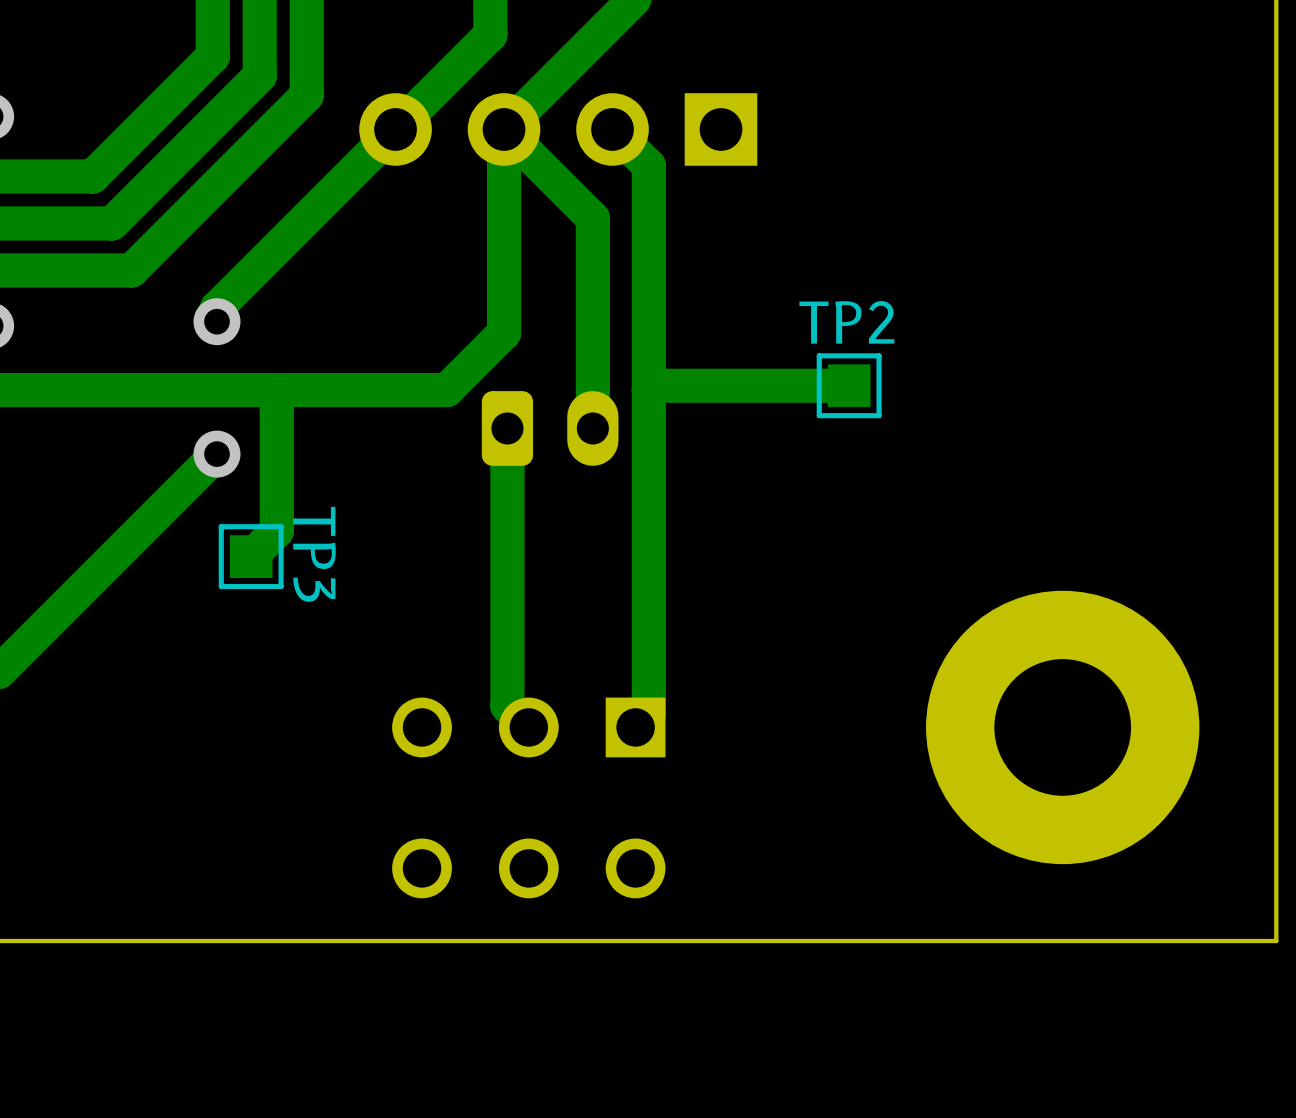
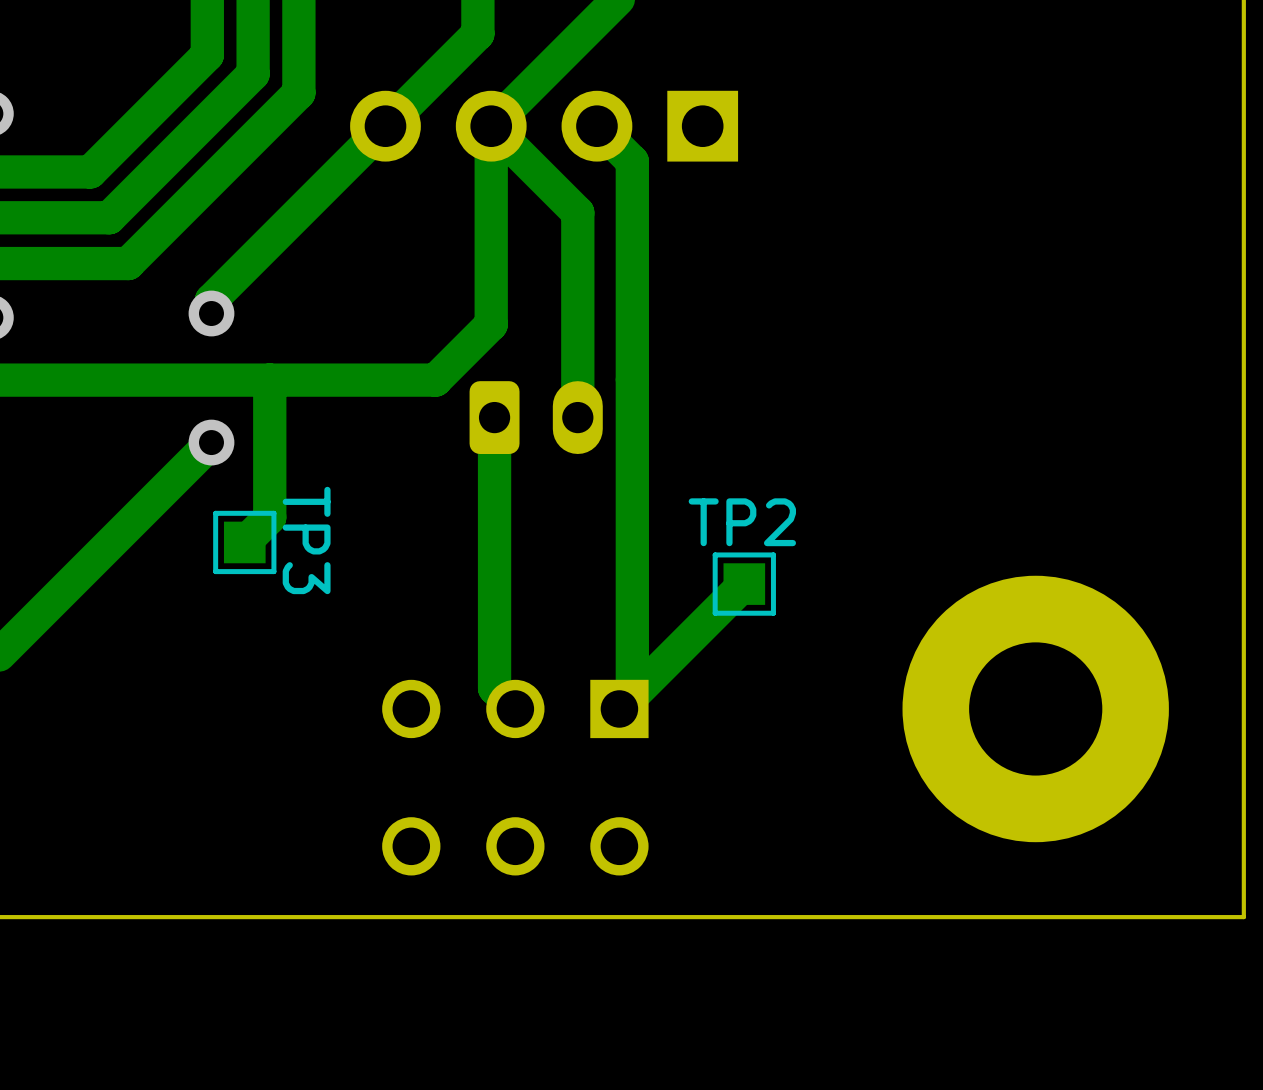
track: (849, 385) (652, 385) (648, 389) -> none
TP2 position: (849, 385) -> (744, 584)
track: none -> (744, 584) (632, 696)

